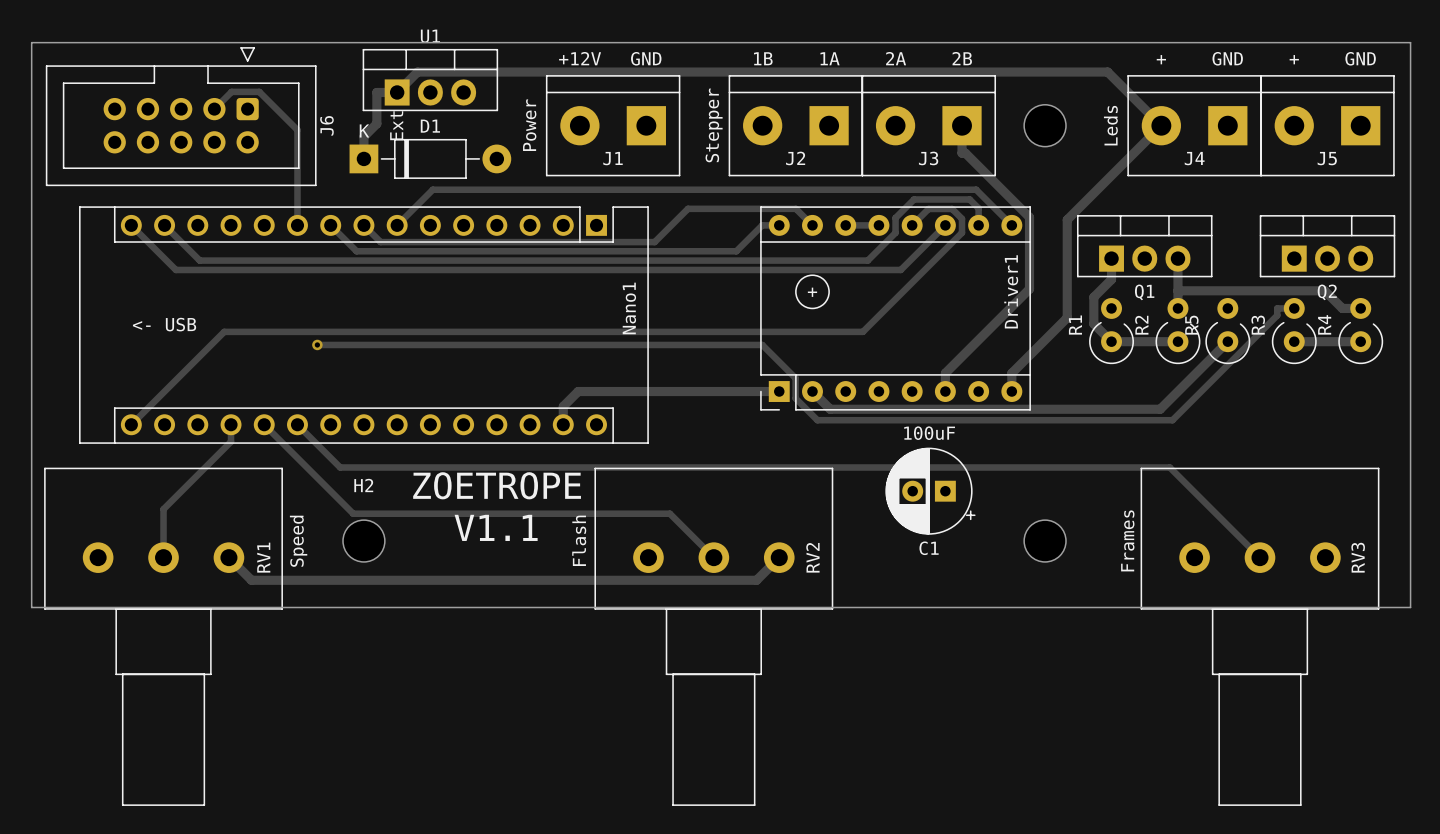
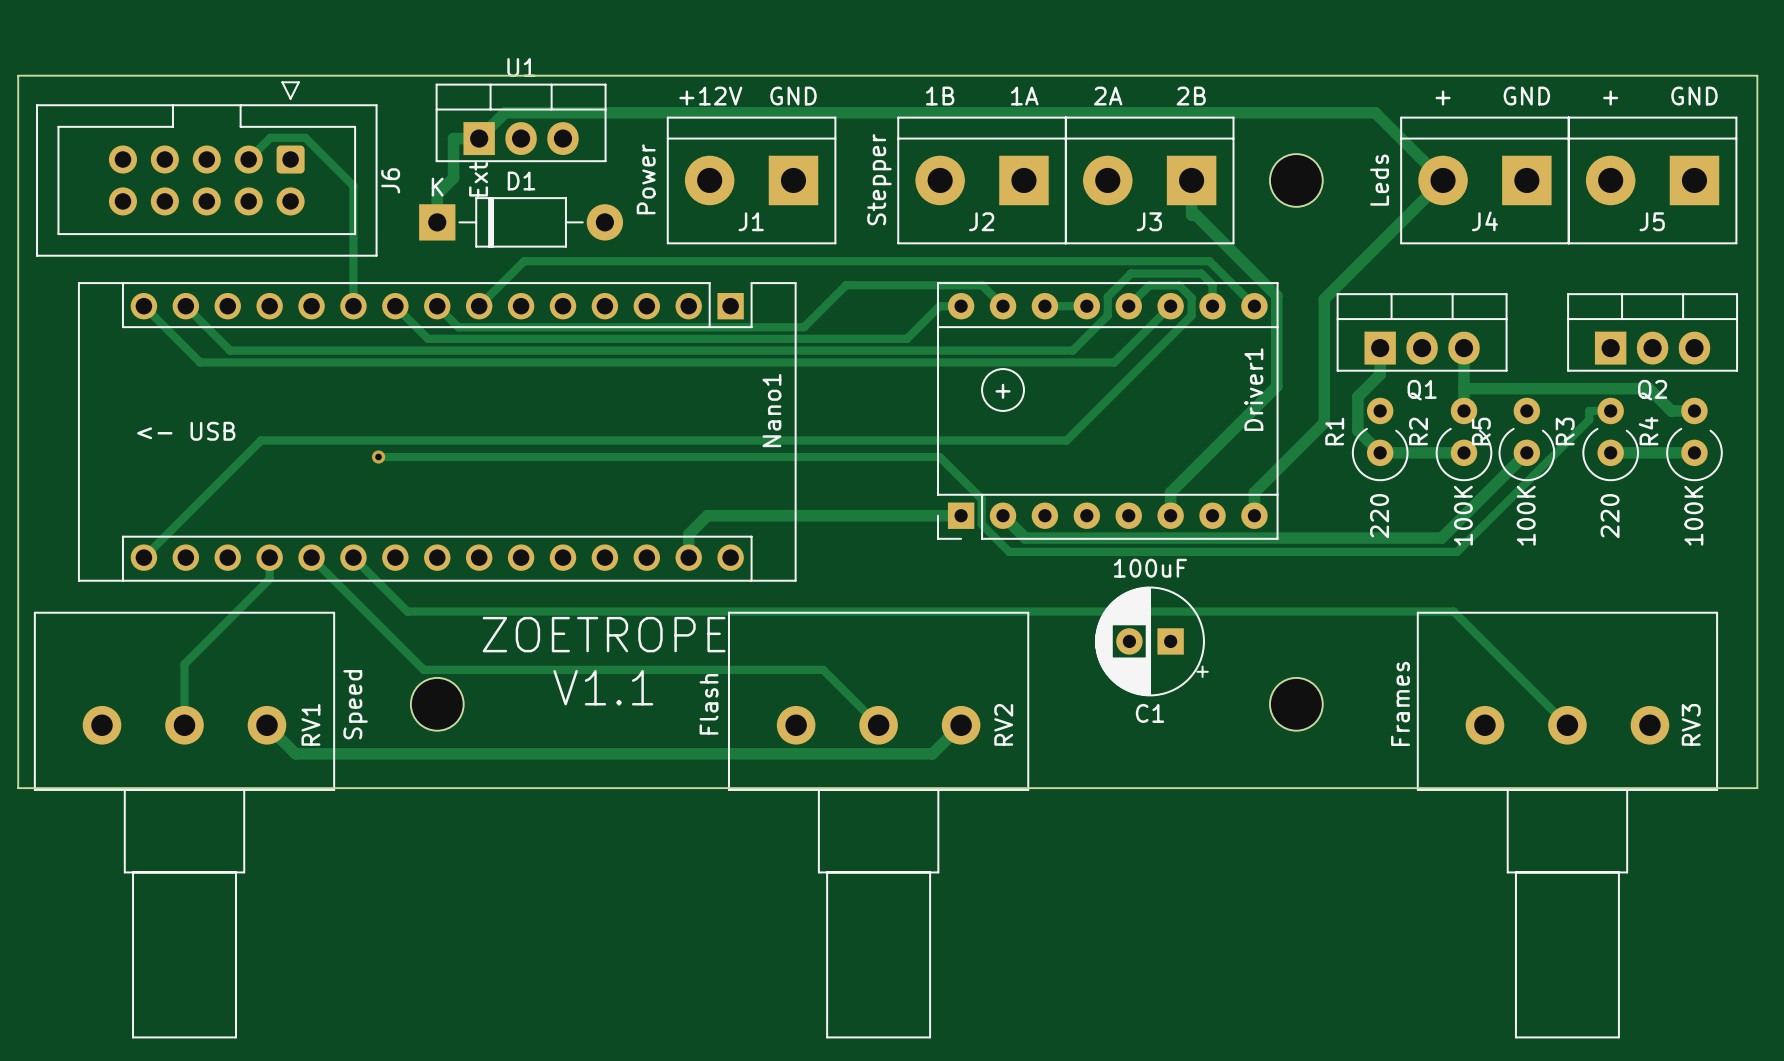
R2 value: none -> 100K (1463, 515)
R5 value: none -> 100K (1526, 515)
R4 value: none -> 100K (1693, 515)
R1 value: none -> 220 (1379, 516)
R3 value: none -> 220 (1610, 516)
H2 name: H2 (363, 485) -> none

